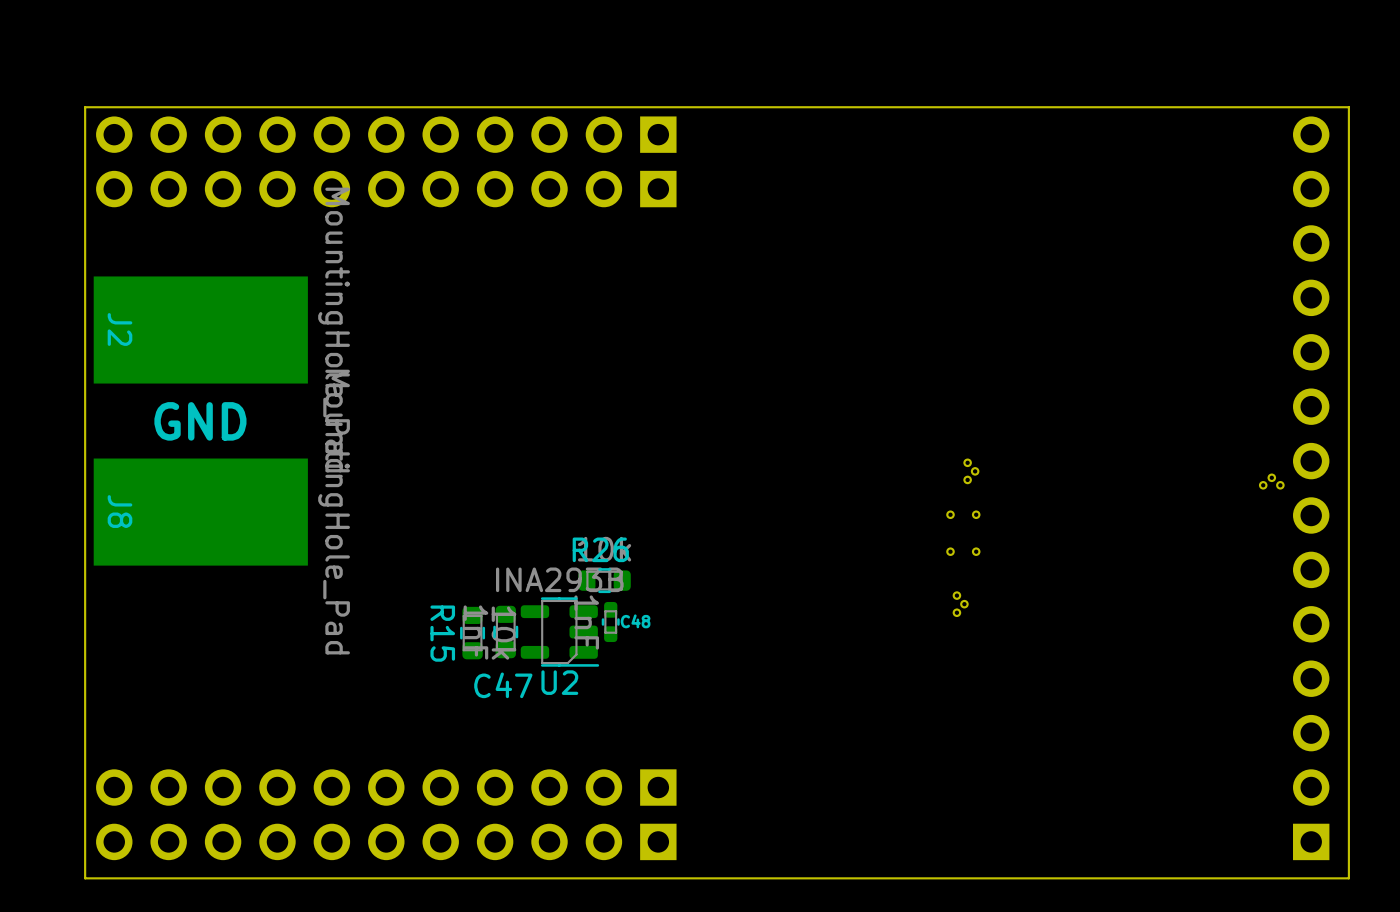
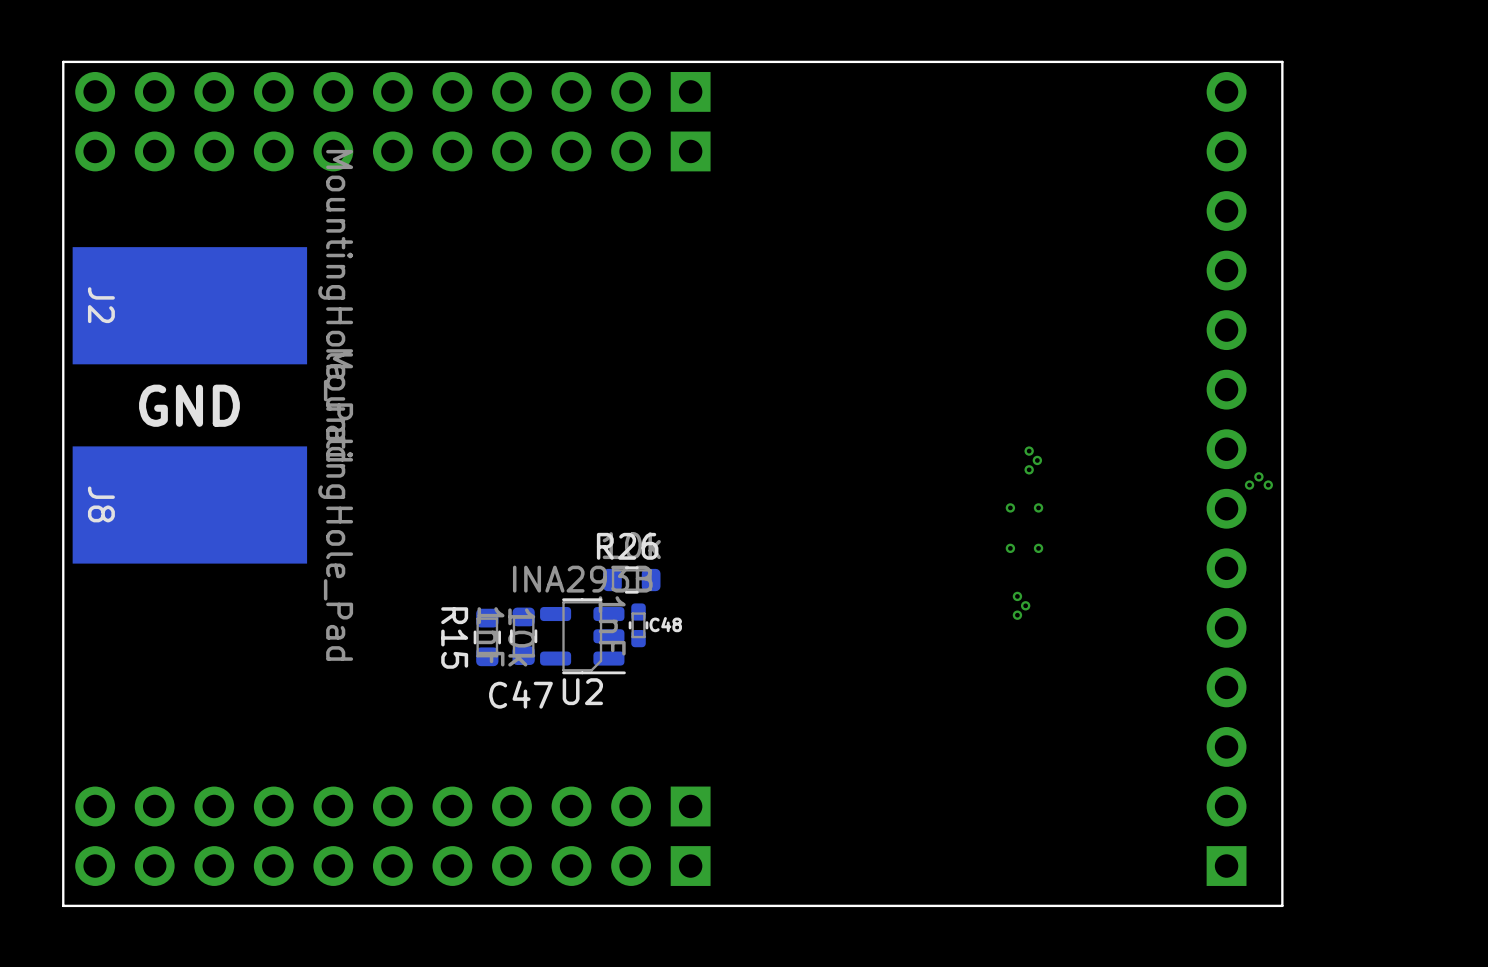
board edge: (1198, 107) (1348, 107) (1348, 878) (1198, 878) -> (1282, 61) (1282, 905)
part position: (1271, 481) -> (1258, 480)
part position: (1311, 488) -> (1226, 478)

